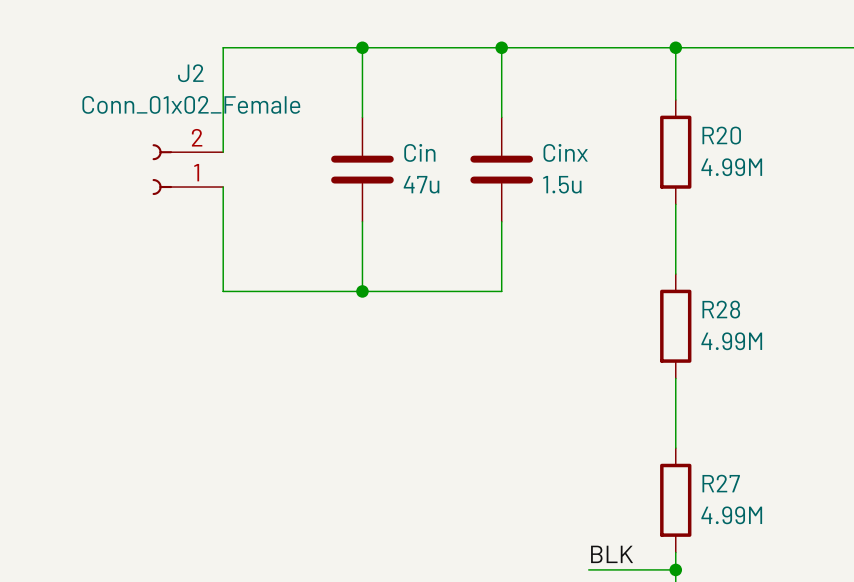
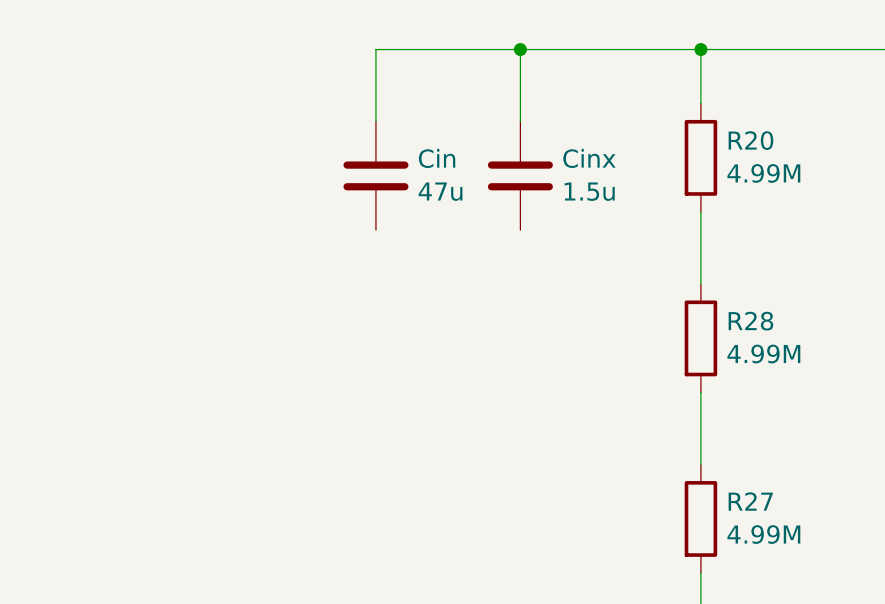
wire: (362, 47) (223, 47) (223, 152) -> none
junction: (362, 47) -> none
J2: Conn_01x02_Female (187, 169) -> none
wire: (223, 187) (223, 291) (501, 291) (501, 221) -> none
wire: (362, 221) (362, 291) -> none
junction: (362, 291) -> none
label: BLK (612, 554) -> none
wire: (588, 569) (675, 569) -> none
junction: (675, 569) -> none

